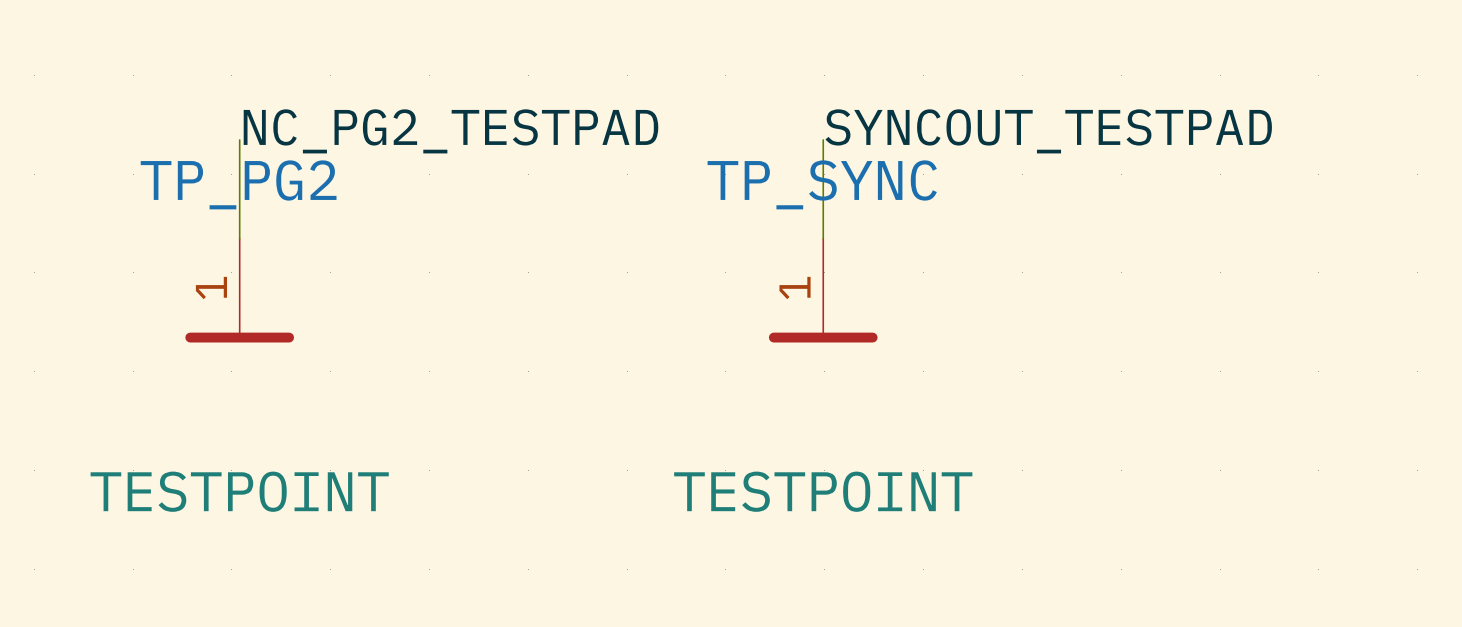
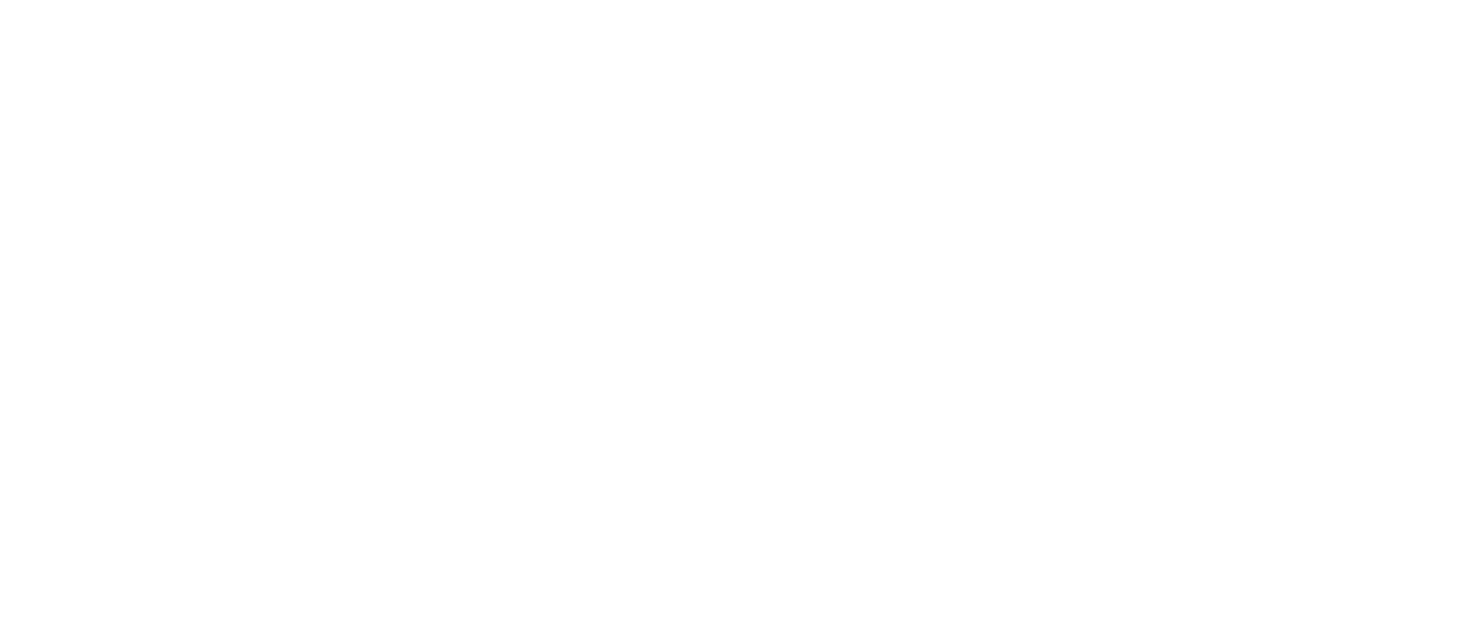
label: NC_PG2_TESTPAD (450, 131) -> none
label: SYNCOUT_TESTPAD (1048, 131) -> none
wire: (239, 139) (239, 238) -> none
wire: (823, 139) (823, 238) -> none
TP_PG2: TESTPOINT (239, 290) -> none
TP_SYNC: TESTPOINT (823, 290) -> none

